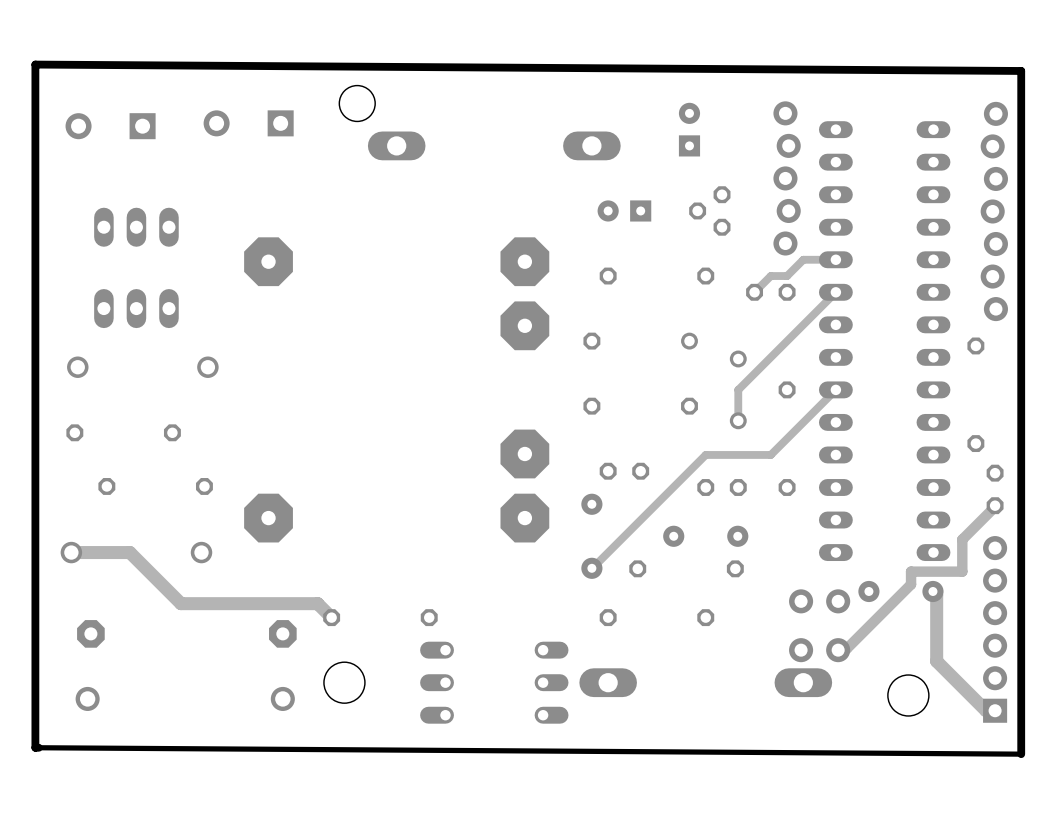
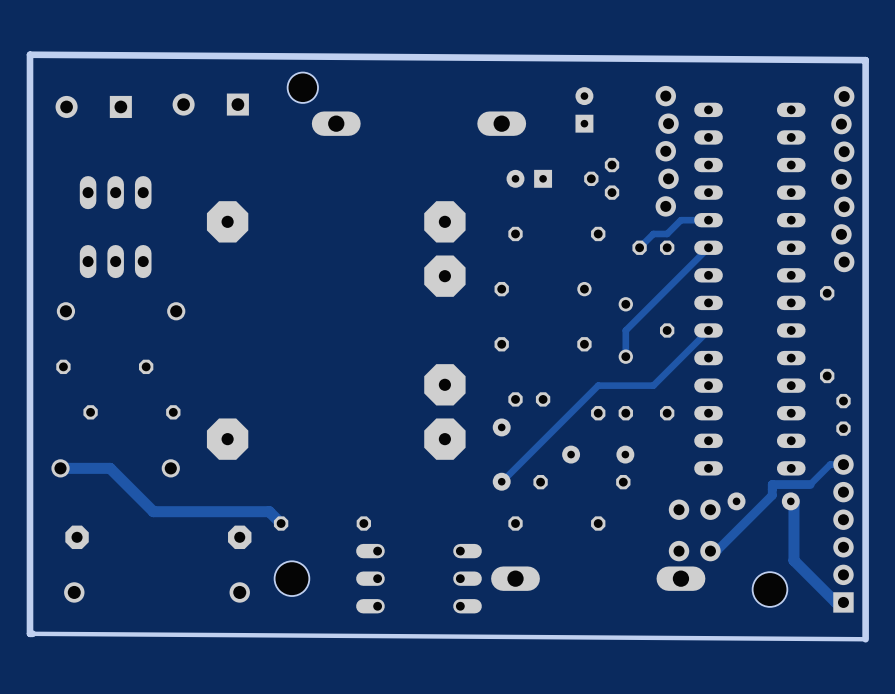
track: (995, 505) (962, 539) (962, 571) (955, 571) -> (843, 464) (830, 464) (810, 484)

